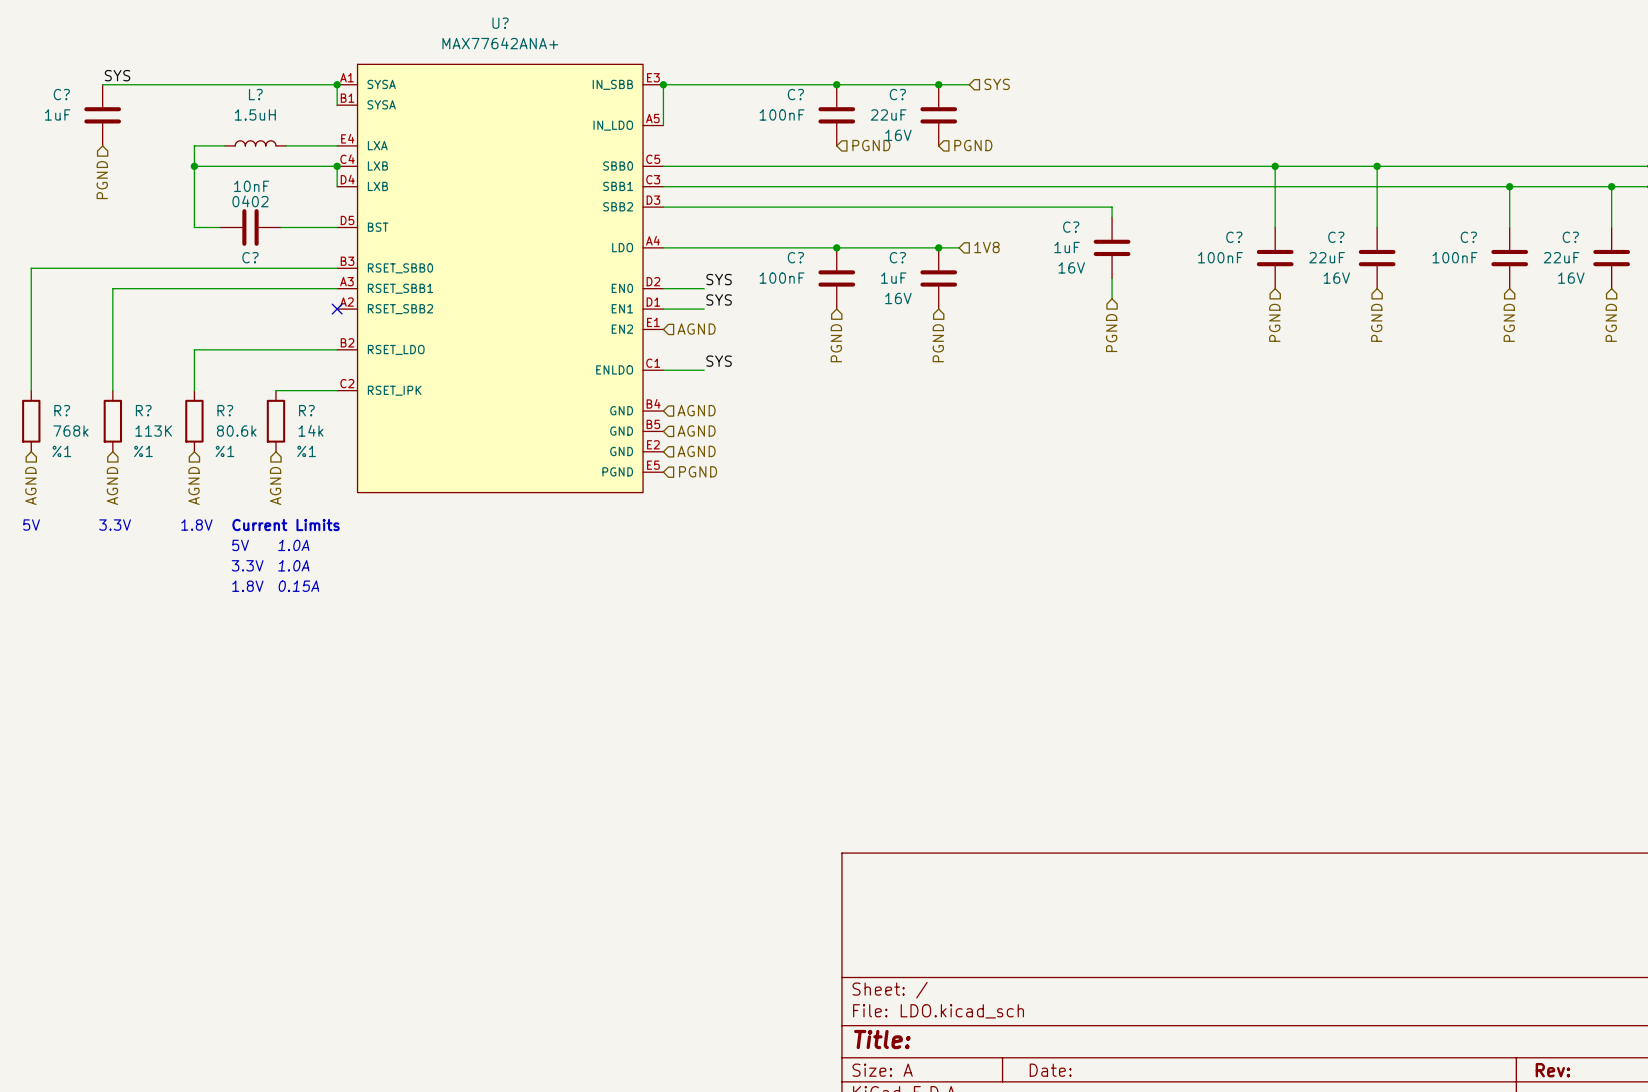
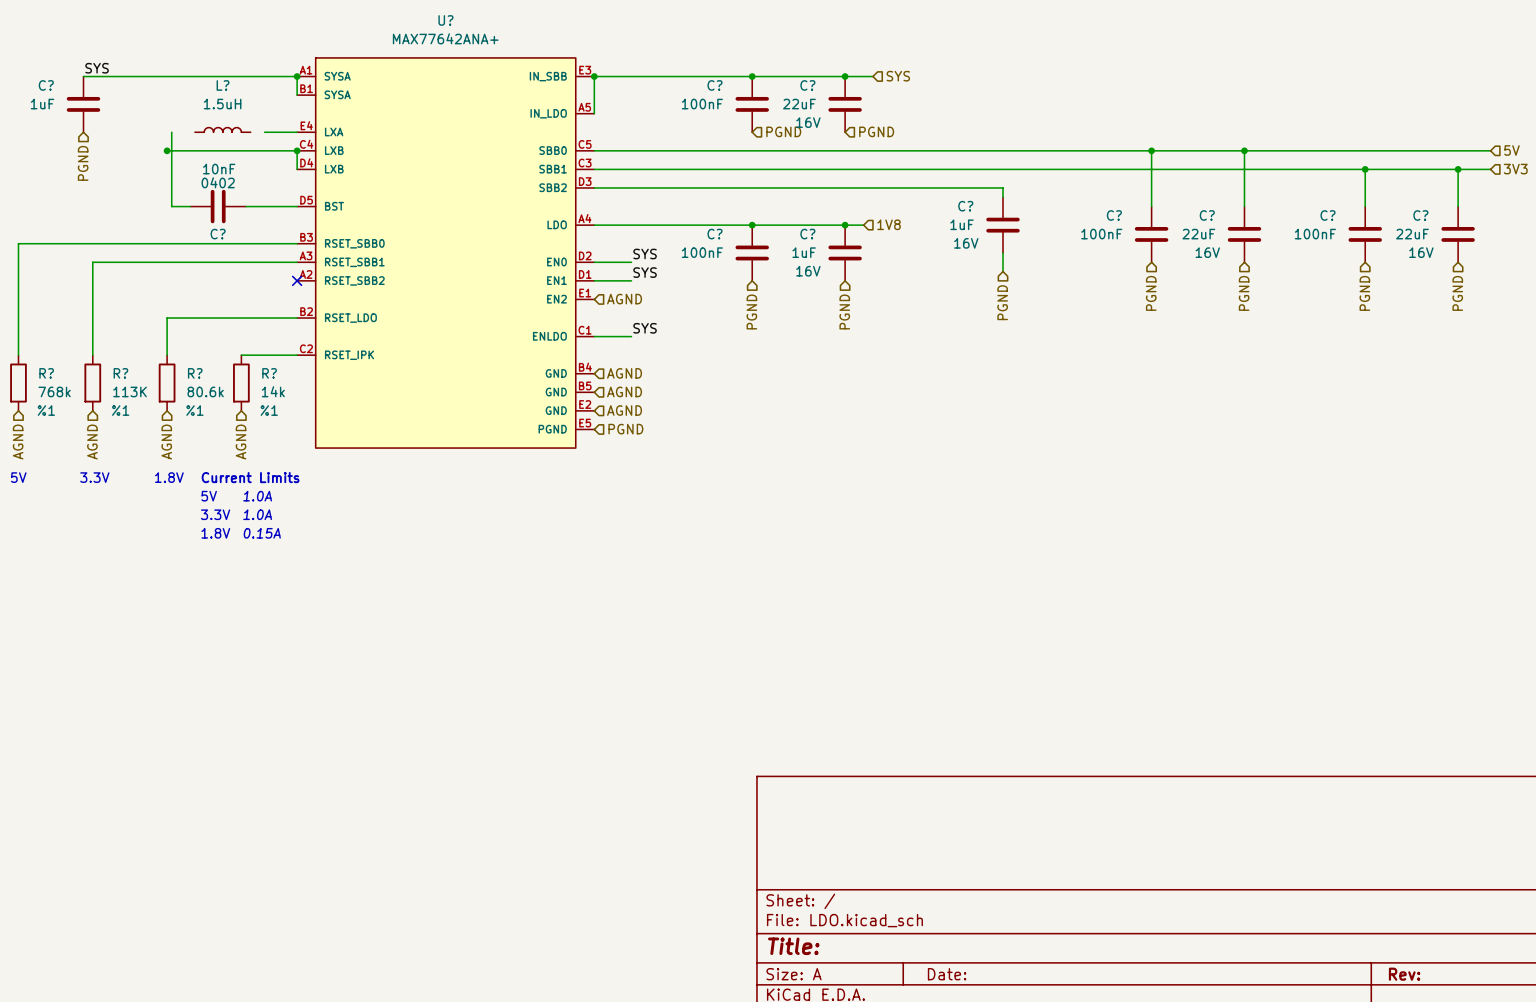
wire: (225, 145) (194, 145) (194, 227) (199, 227) -> (171, 132) (171, 206)
wire: (286, 145) (301, 145) -> none

